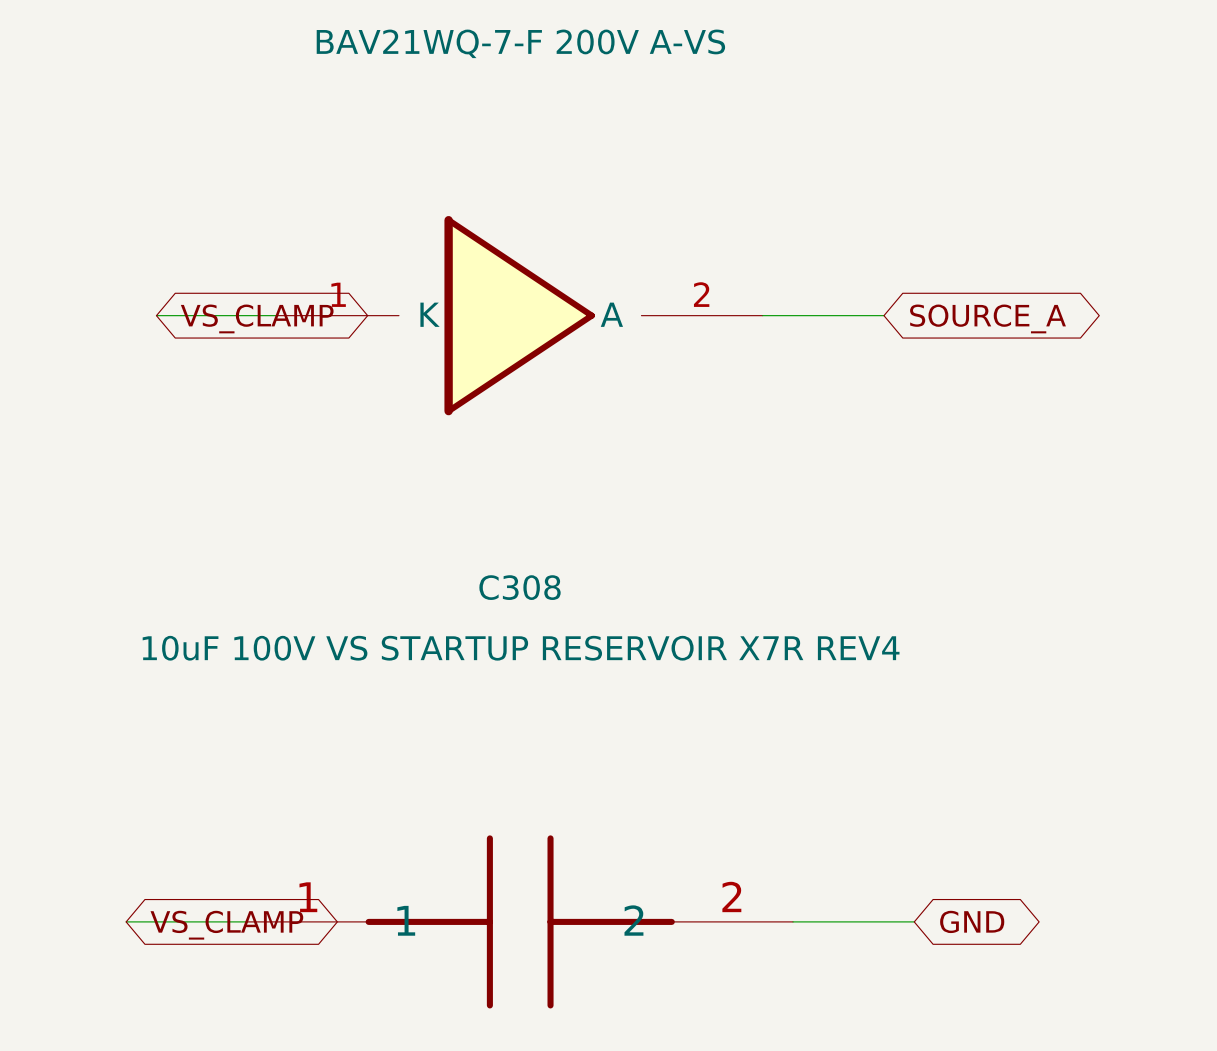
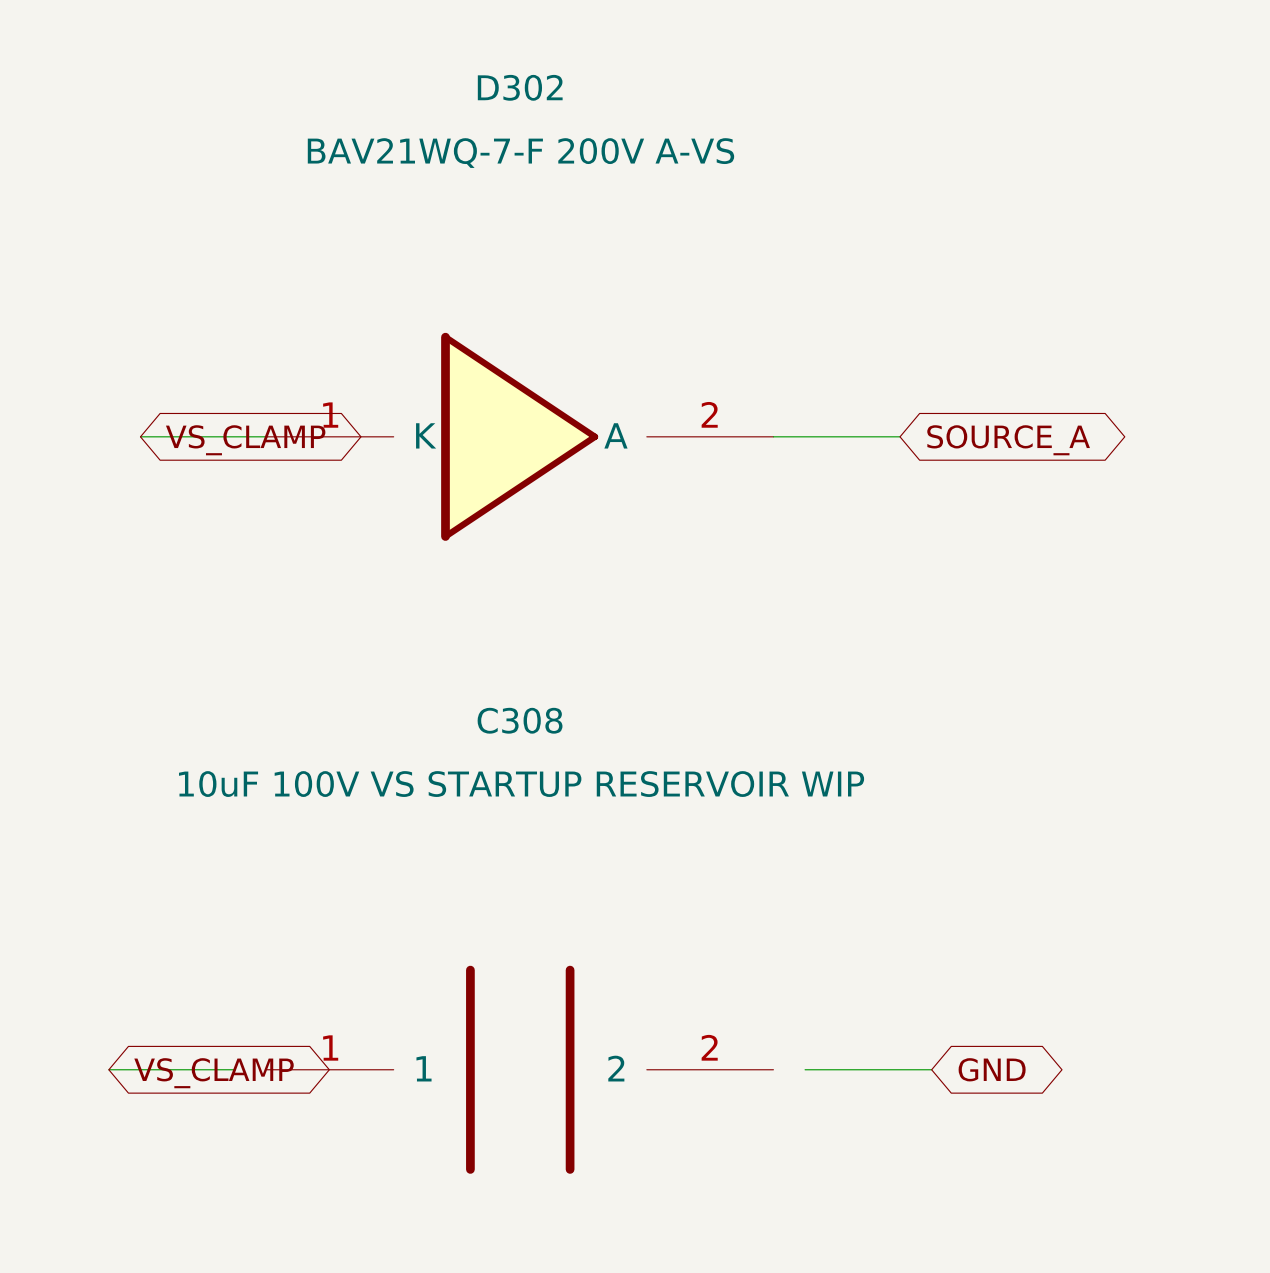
C308 value: 10uF 100V VS STARTUP RESERVOIR X7R REV4 (521, 648) -> 10uF 100V VS STARTUP RESERVOIR WIP (521, 784)
C308 symbol: [247, 835, 794, 1009] -> [267, 965, 774, 1174]

